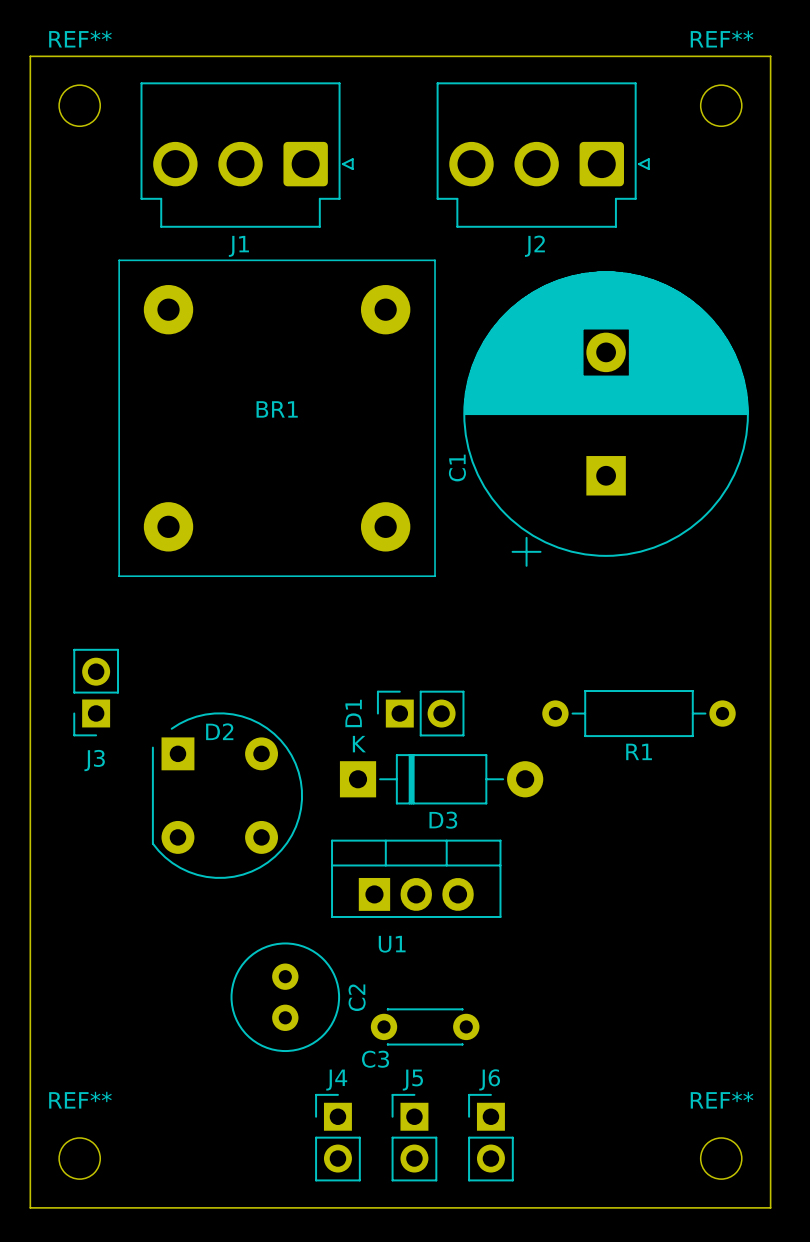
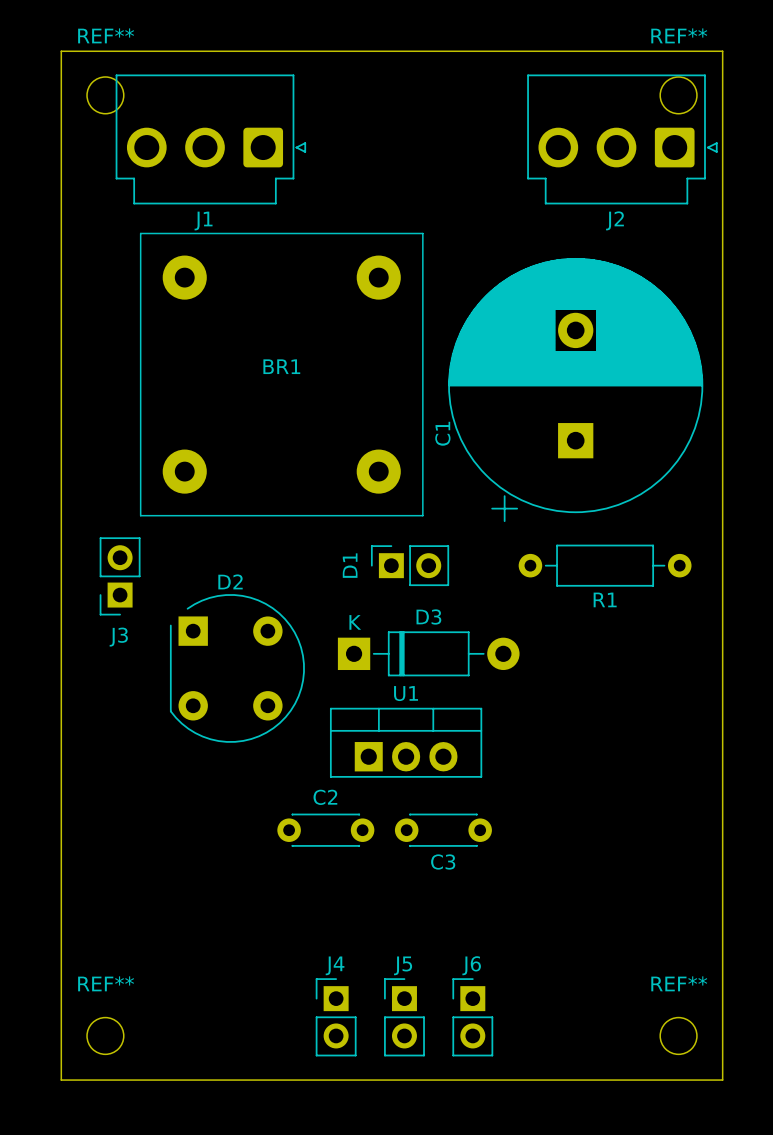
J1 position: (247, 155) -> (210, 139)
J2 position: (543, 155) -> (622, 139)
C1 position: (606, 419) -> (575, 389)
J3 position: (96, 692) -> (120, 576)
D1 position: (420, 713) -> (410, 565)
R1 position: (639, 713) -> (605, 565)
D2 name position: D2 (219, 731) -> D2 (230, 581)
D3 position: (441, 779) -> (428, 653)
D2 position: (227, 795) -> (237, 668)
D3 name position: D3 (443, 820) -> D3 (428, 617)
U1 position: (416, 878) -> (406, 742)
C2 footprint: [230, 942, 341, 1053] -> [277, 813, 375, 847]
U1 name position: U1 (392, 944) -> U1 (406, 693)
C2 name position: C2 (357, 997) -> C2 (325, 797)
C3 position: (425, 1026) -> (443, 830)
C3 name position: C3 (375, 1059) -> C3 (443, 862)

